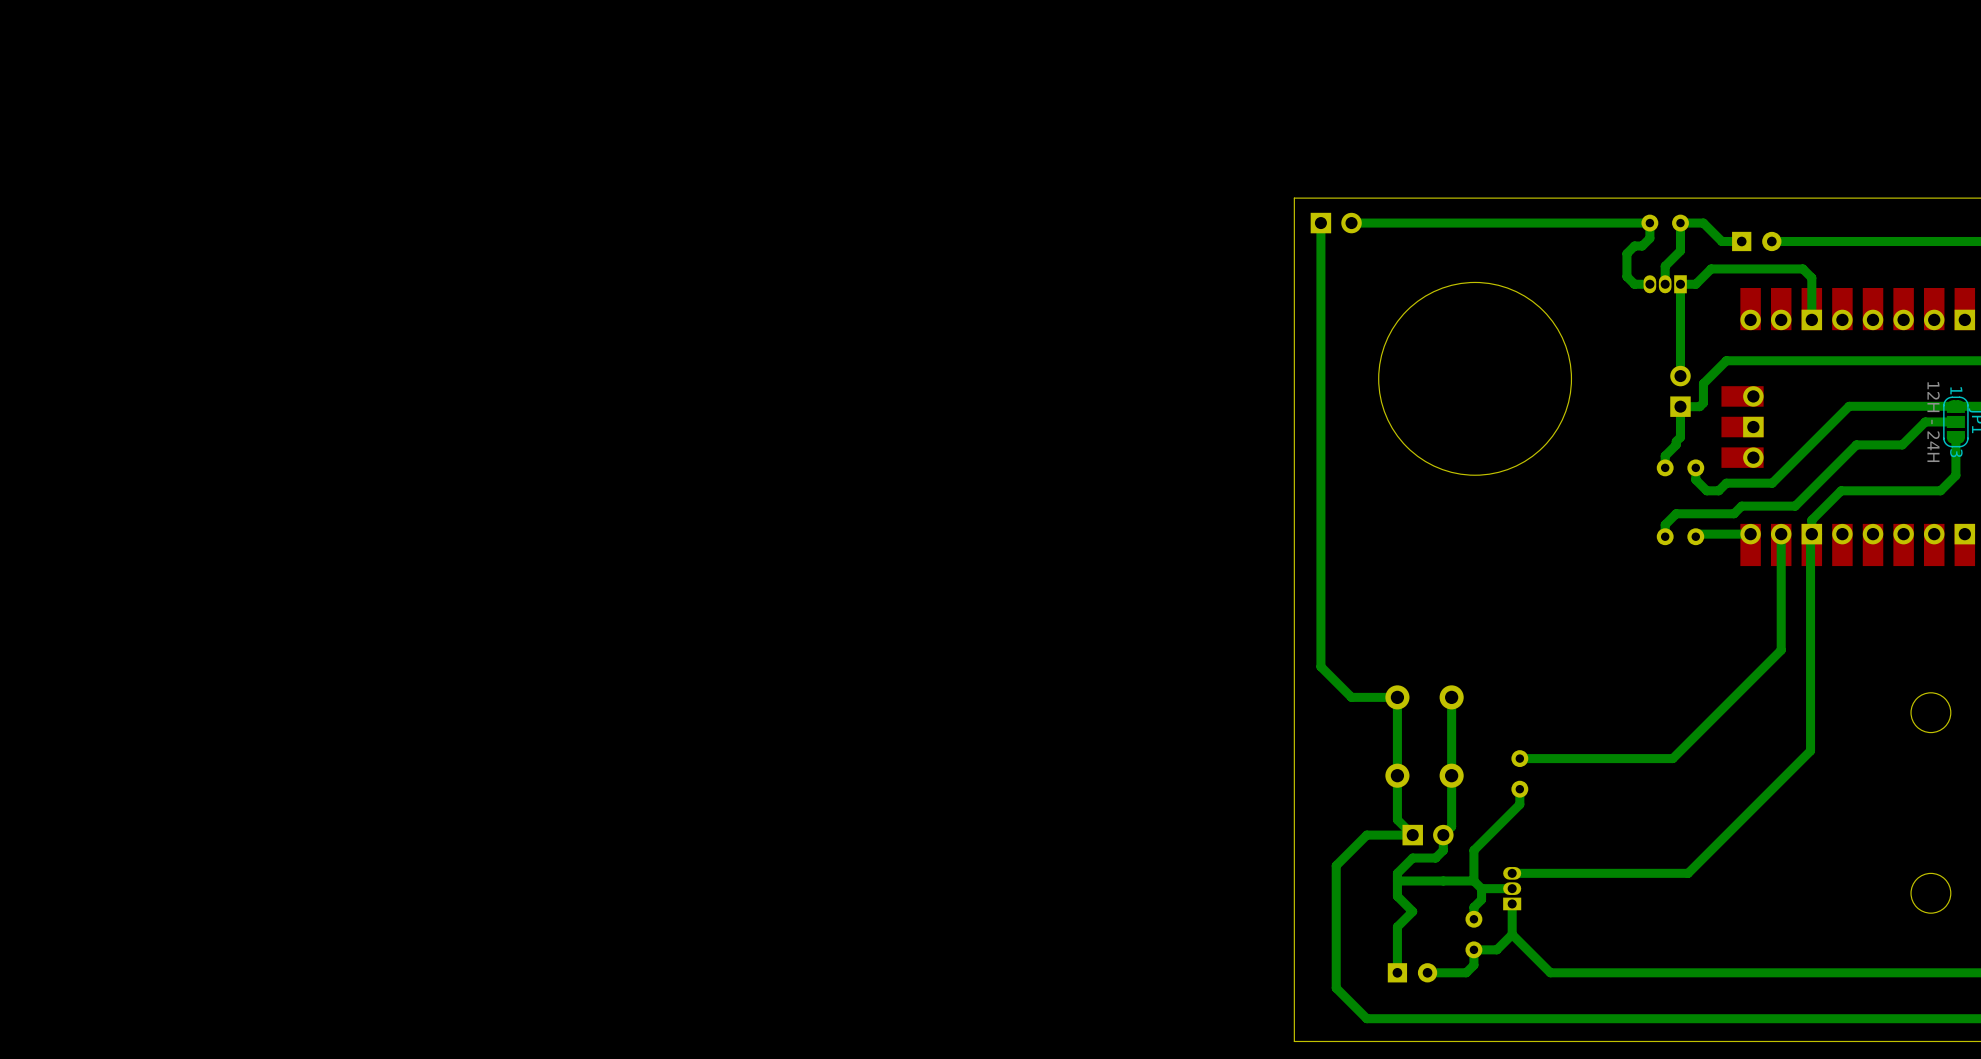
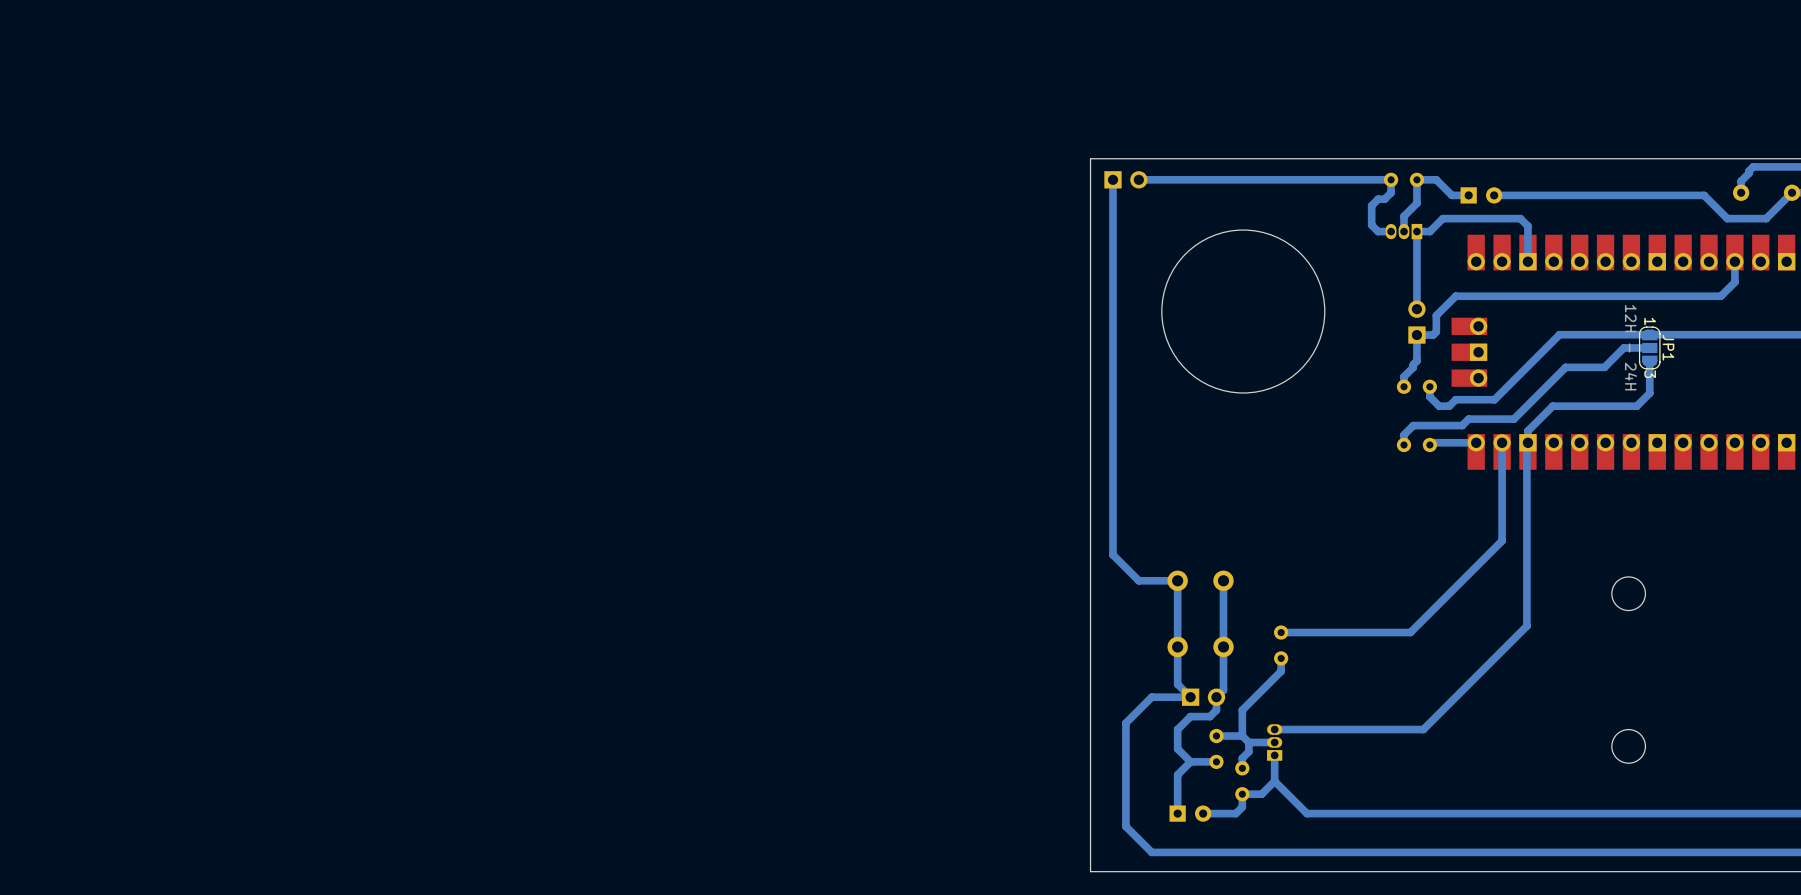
bottom track: (1443, 880) (1397, 880) -> none
part: none -> (1216, 748)
bottom track: none -> (1216, 761) (1190, 761)

